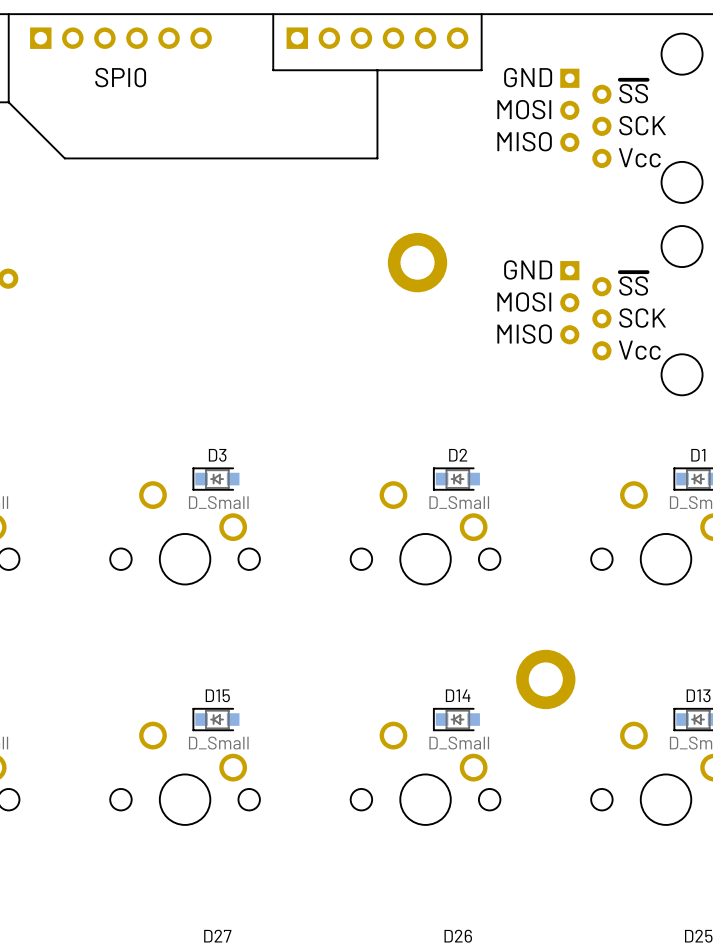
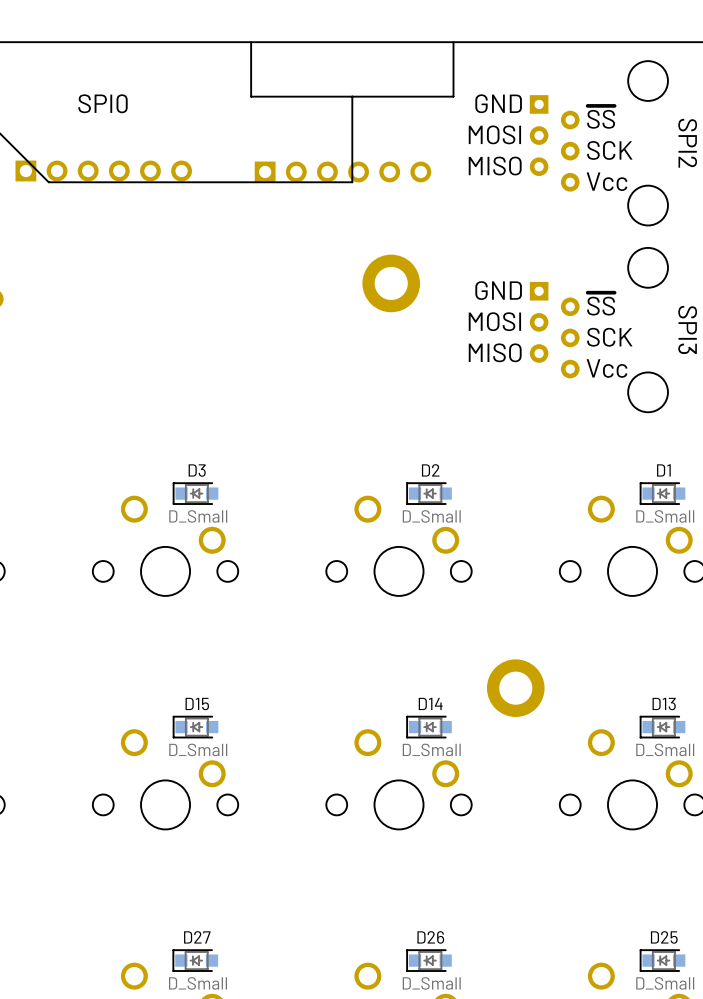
part position: (120, 38) -> (103, 170)
part position: (377, 38) -> (343, 171)

